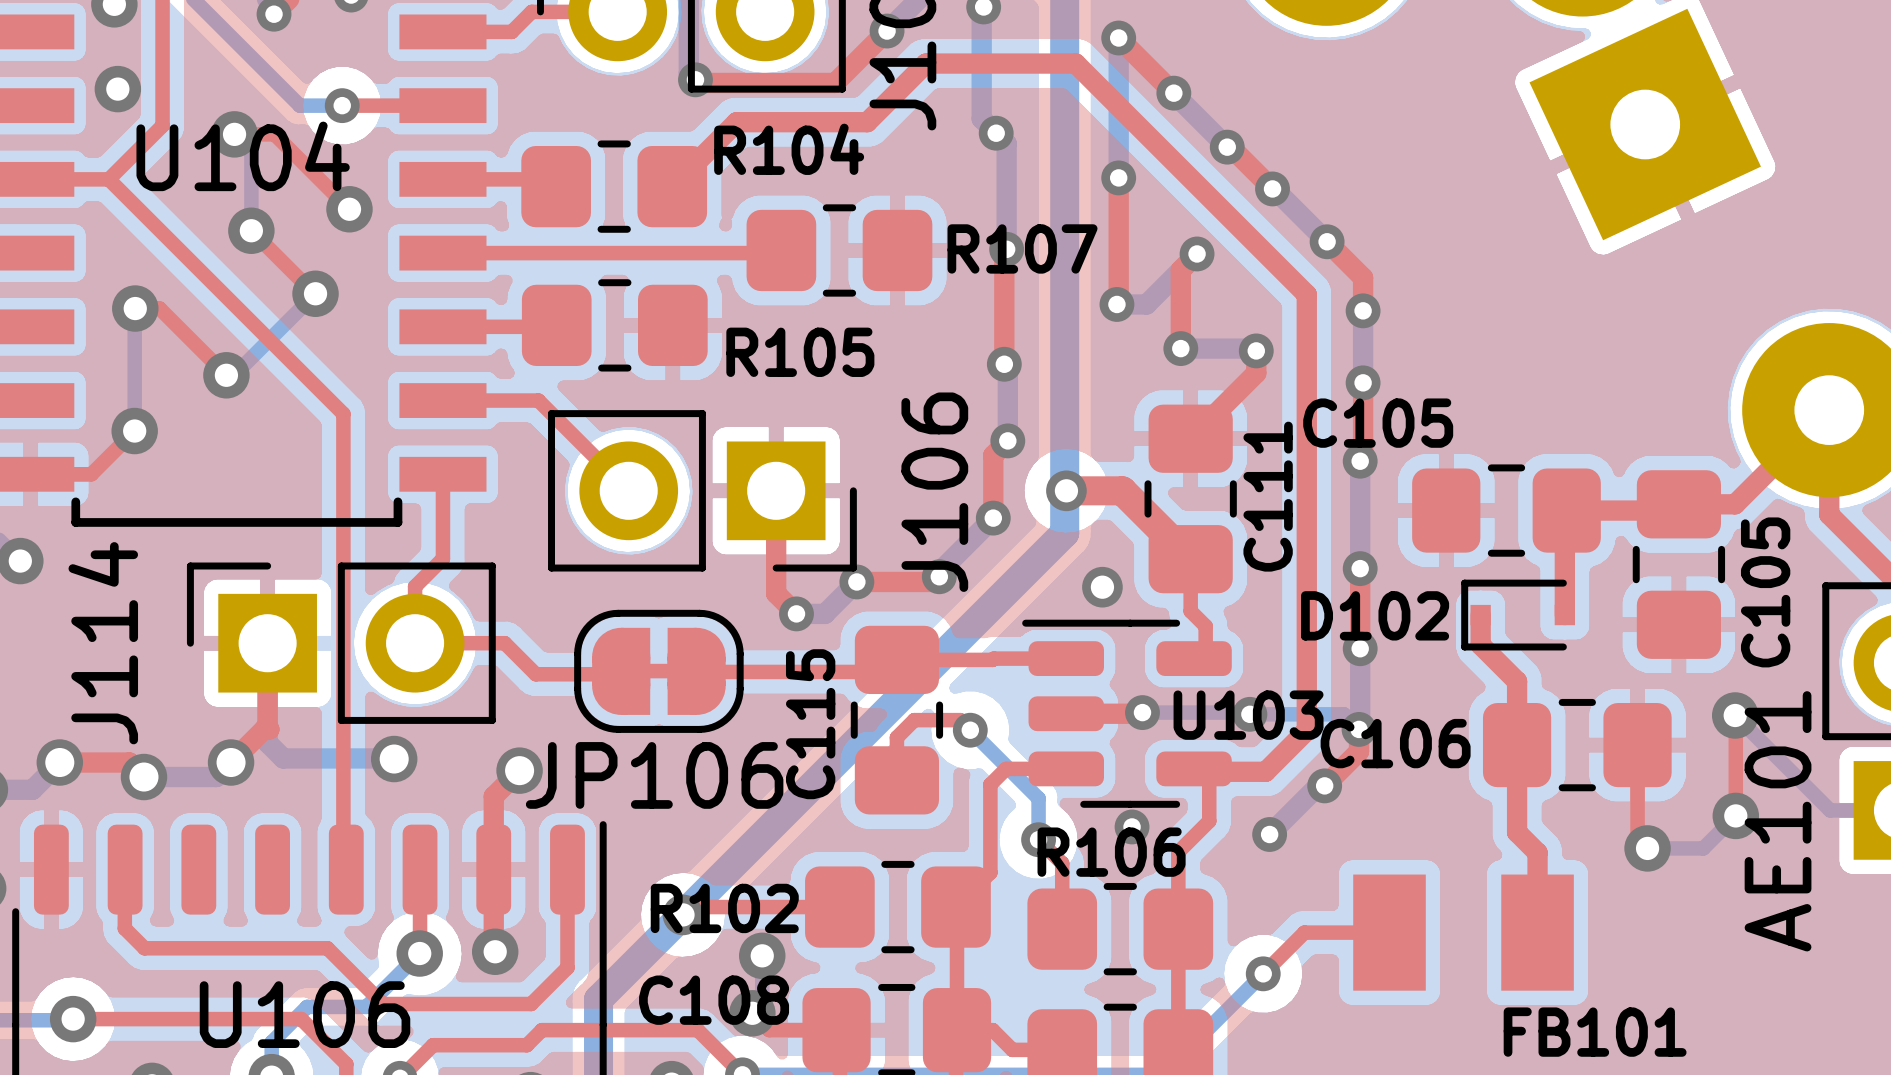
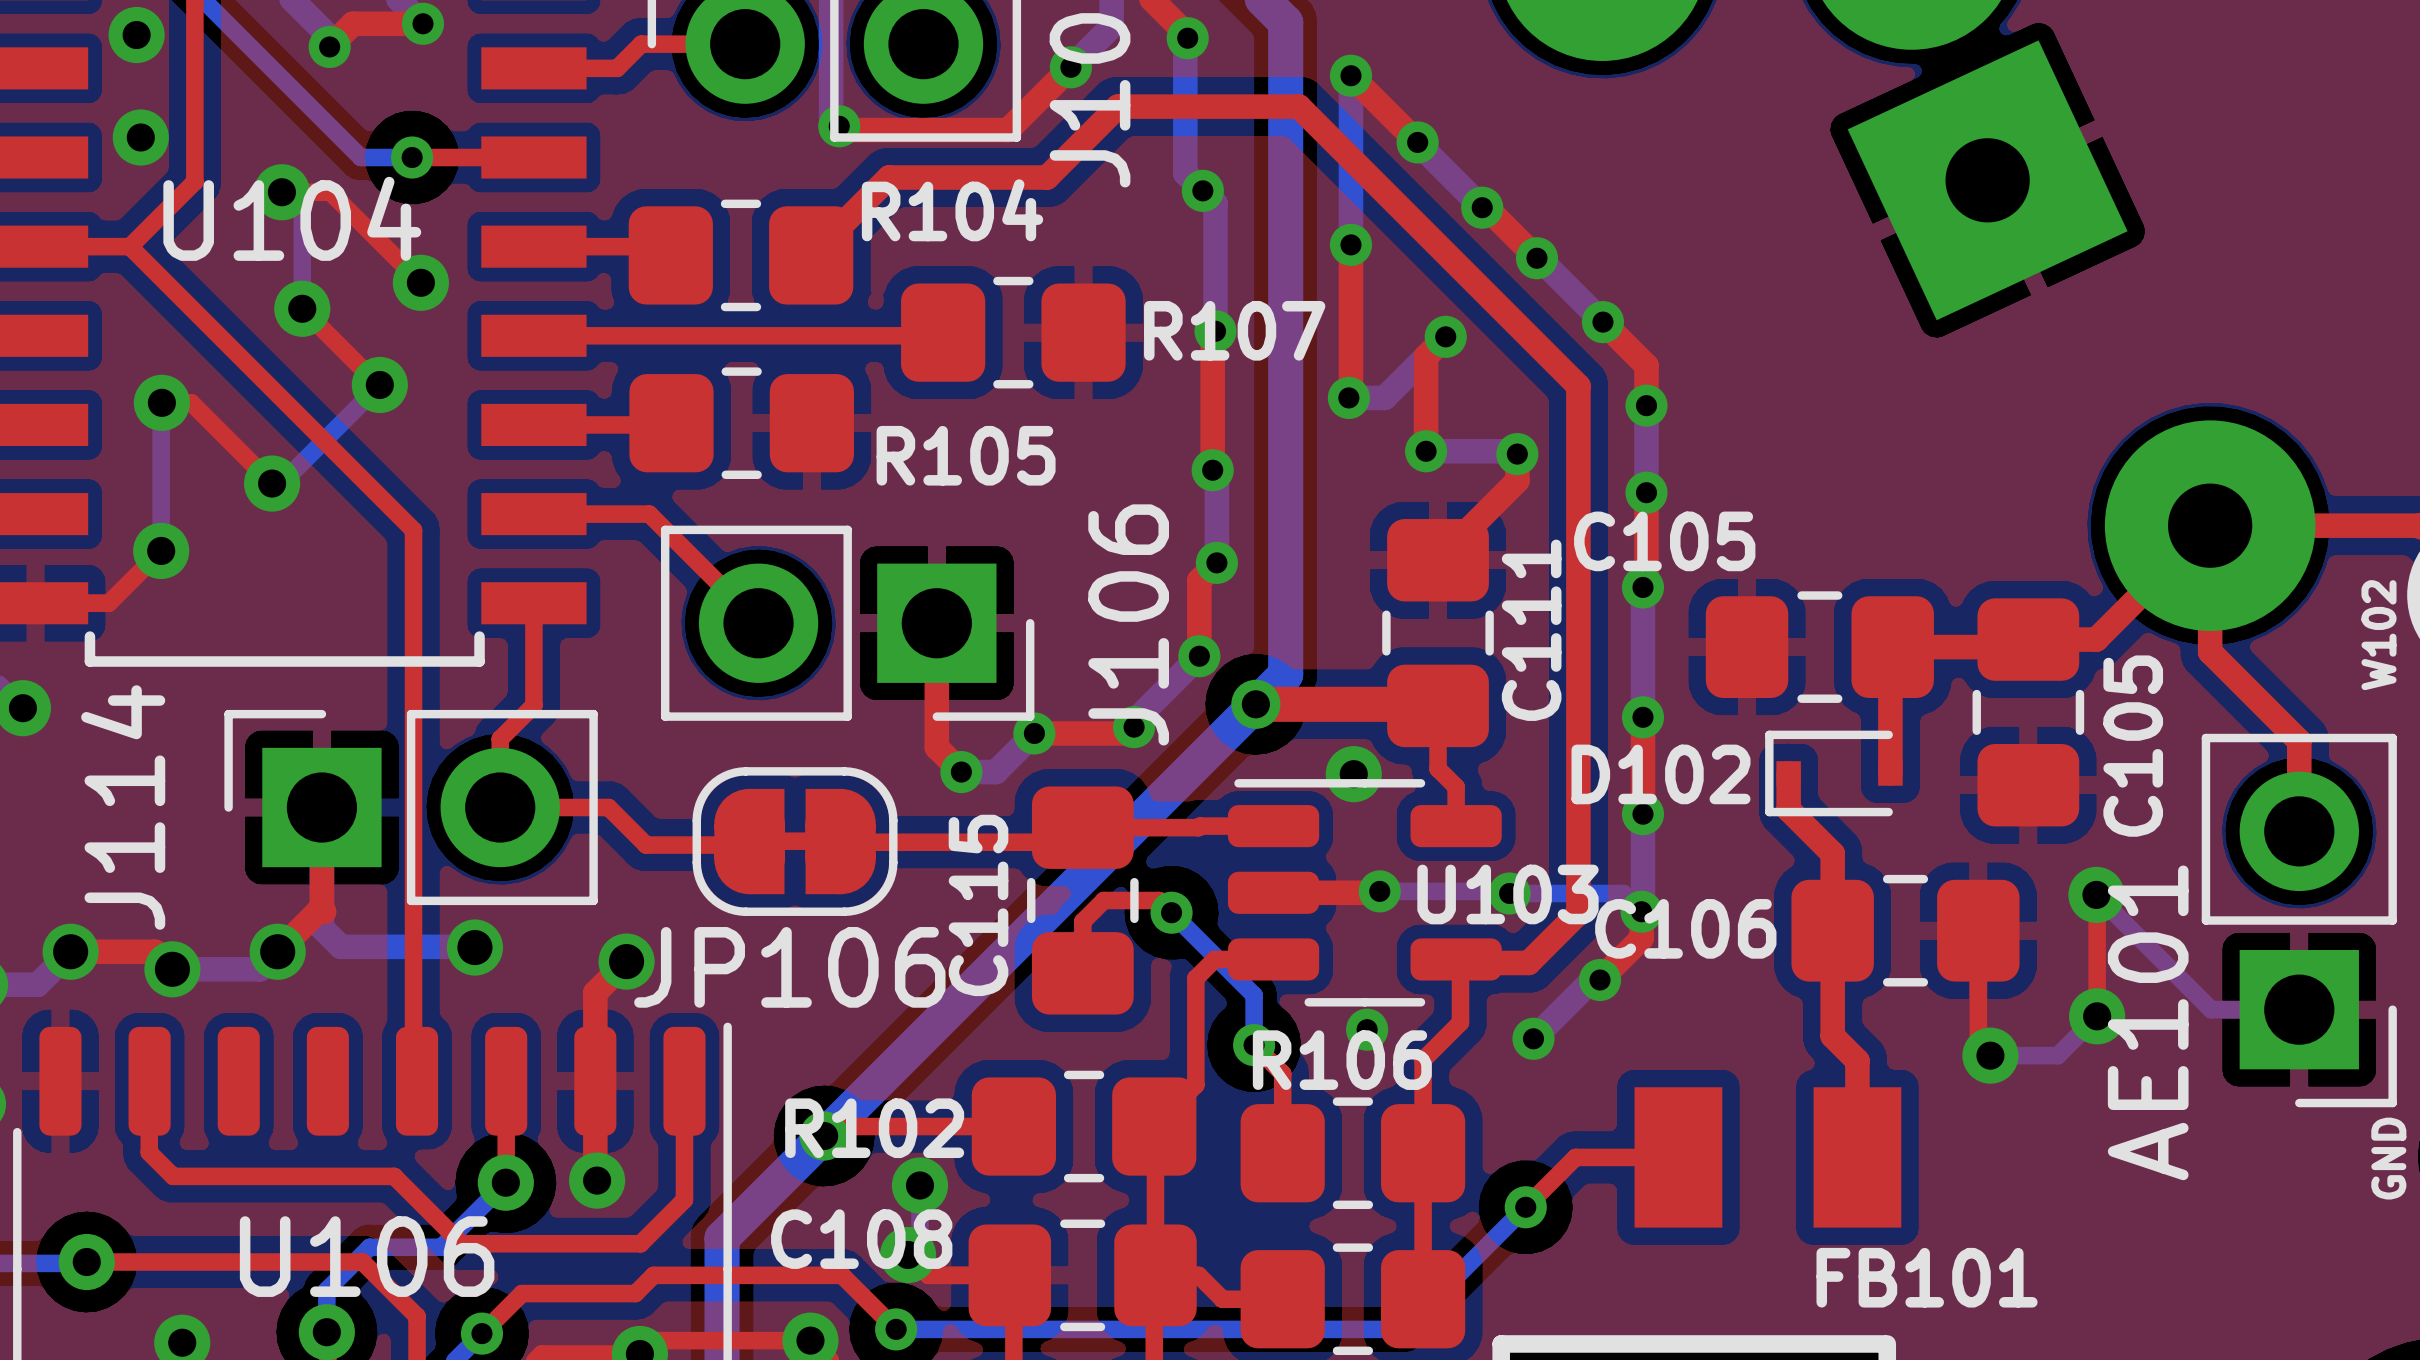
top track: (1066, 490) (1122, 490) (1189, 557) -> (1255, 704) (1436, 704)
via: (1066, 490) -> none
via: none -> (1255, 704)
via position: (1102, 587) -> (1353, 774)
U103 footprint: [1022, 619, 1232, 808] -> [1227, 779, 1502, 1007]

